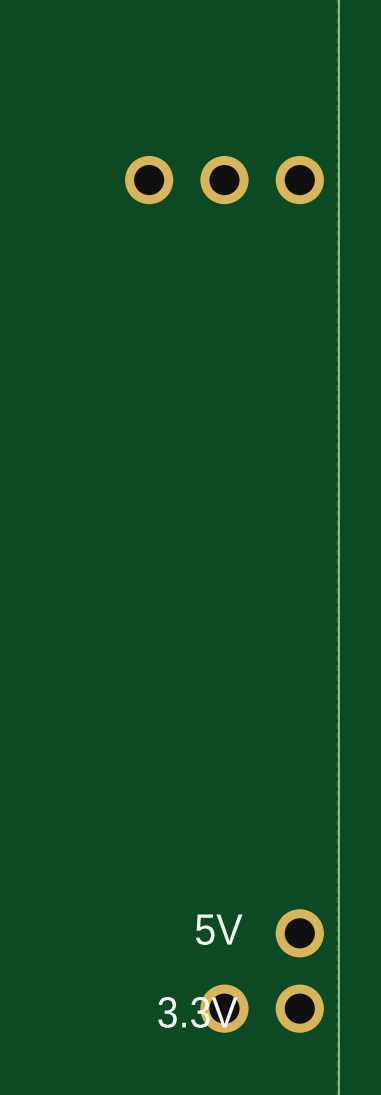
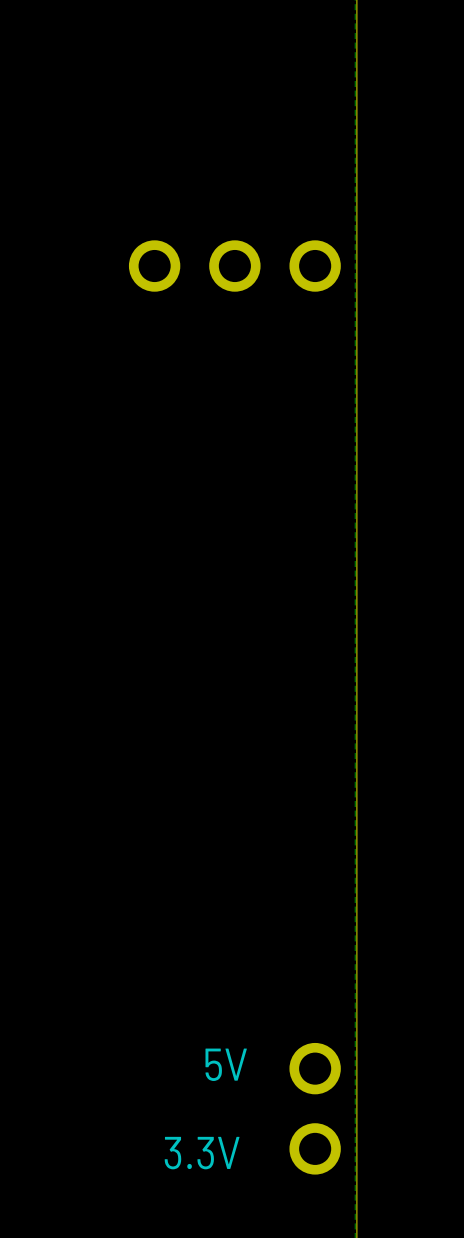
part: (224, 1008) -> none

